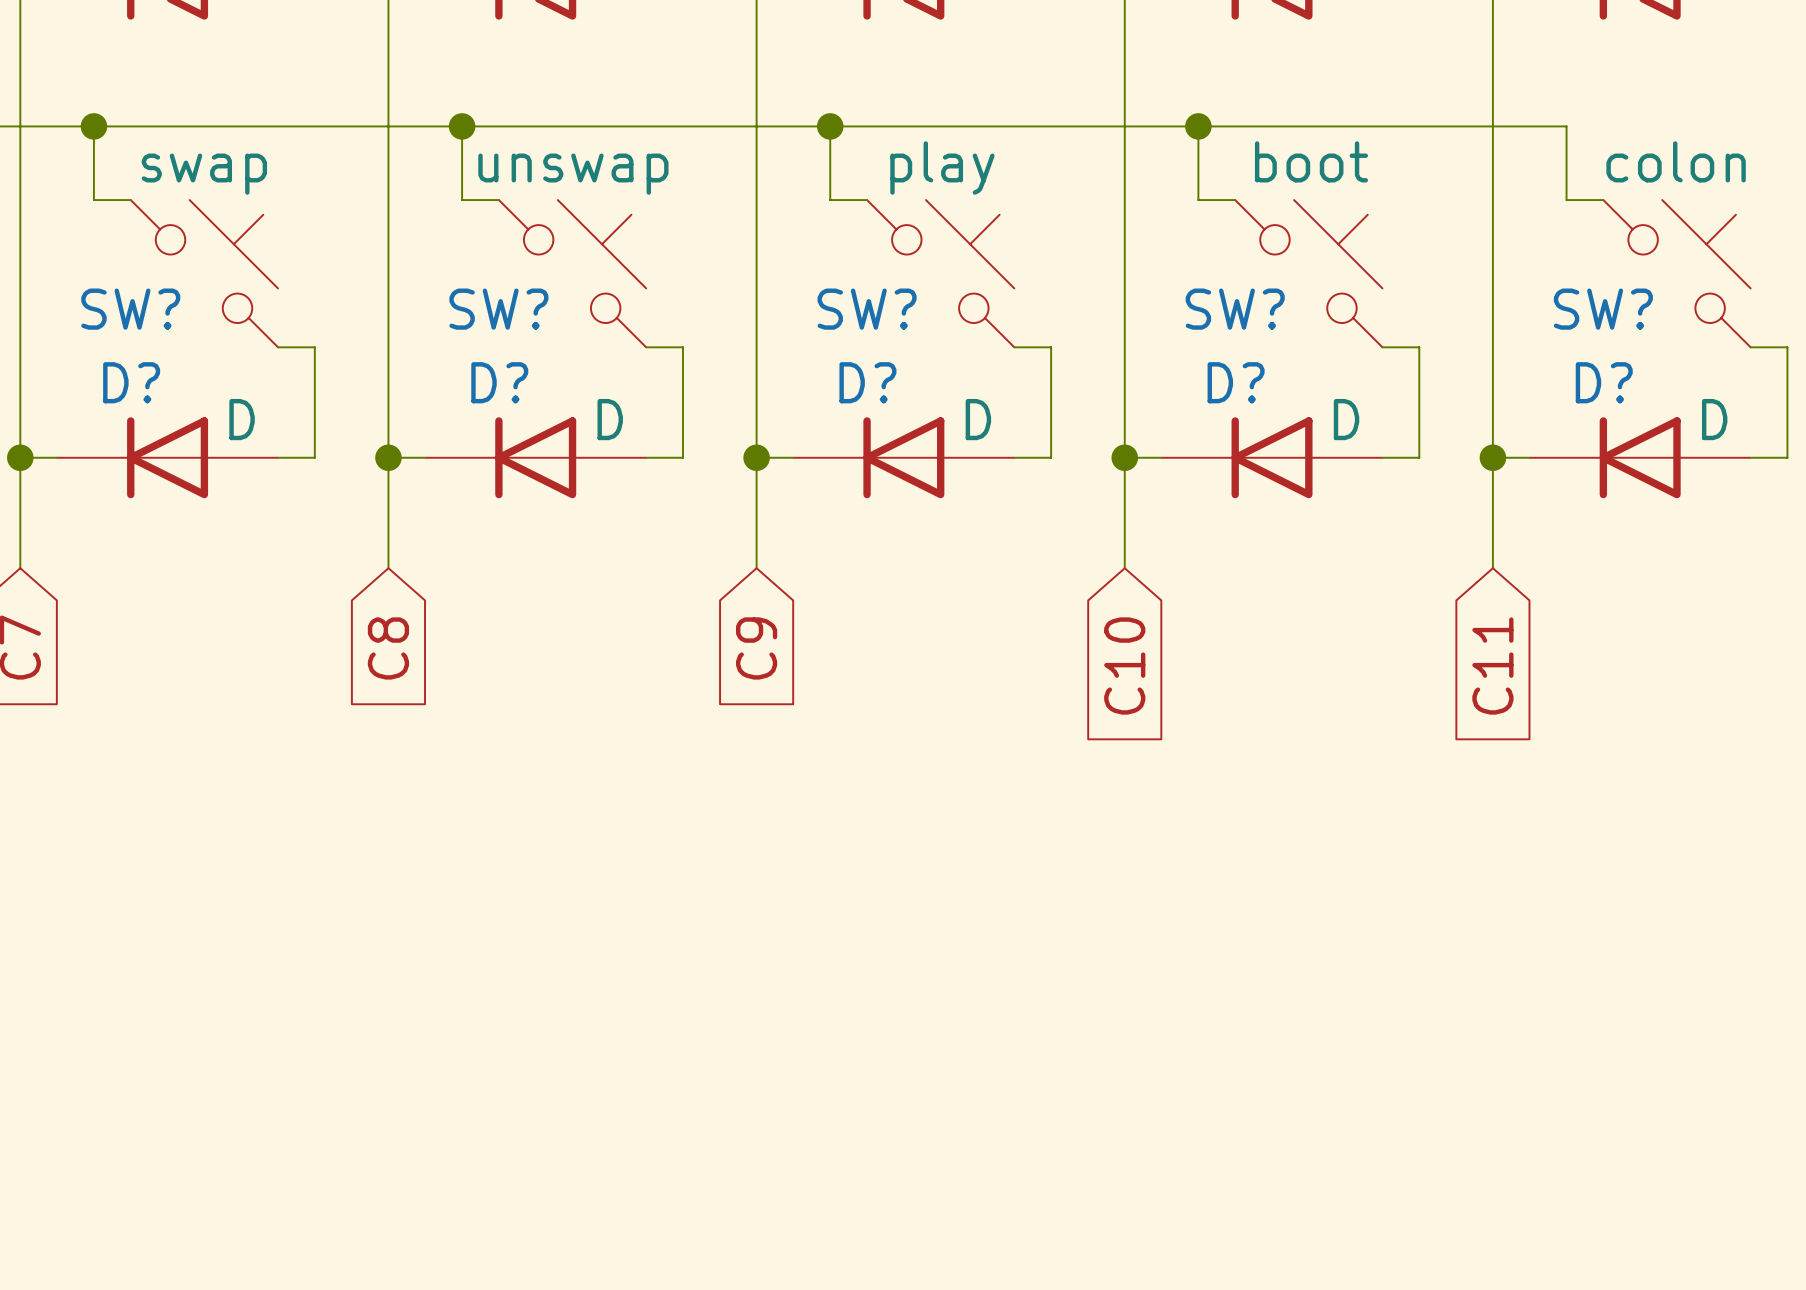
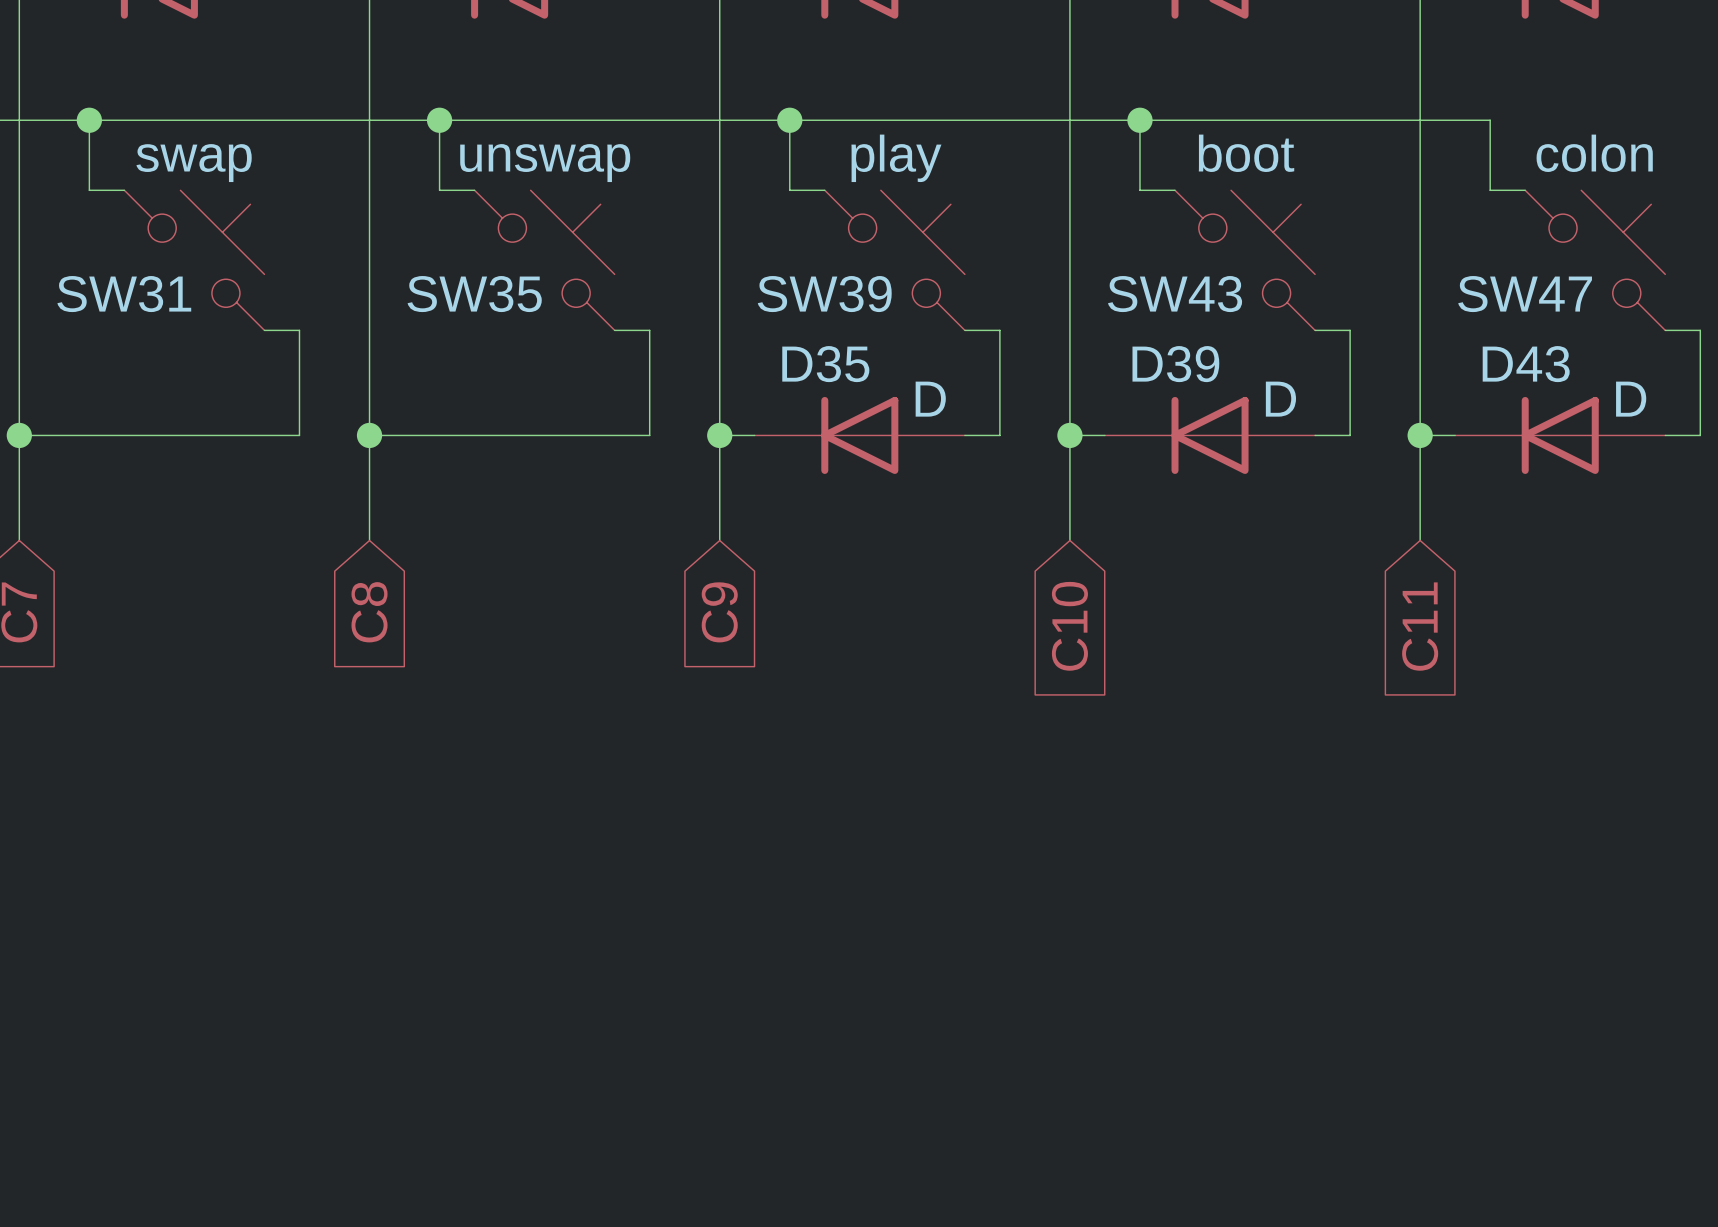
SW? name: SW? (130, 309) -> SW31 (124, 294)
SW? name: SW? (498, 309) -> SW35 (474, 294)
SW? name: SW? (867, 309) -> SW39 (824, 294)
SW? name: SW? (1235, 309) -> SW43 (1175, 294)
SW? name: SW? (1603, 309) -> SW47 (1525, 294)
D? name: D? (867, 382) -> D35 (825, 364)
D? name: D? (1236, 382) -> D39 (1175, 364)
D? name: D? (1604, 382) -> D43 (1526, 364)
D?: D (167, 457) -> none
D?: D (535, 457) -> none

